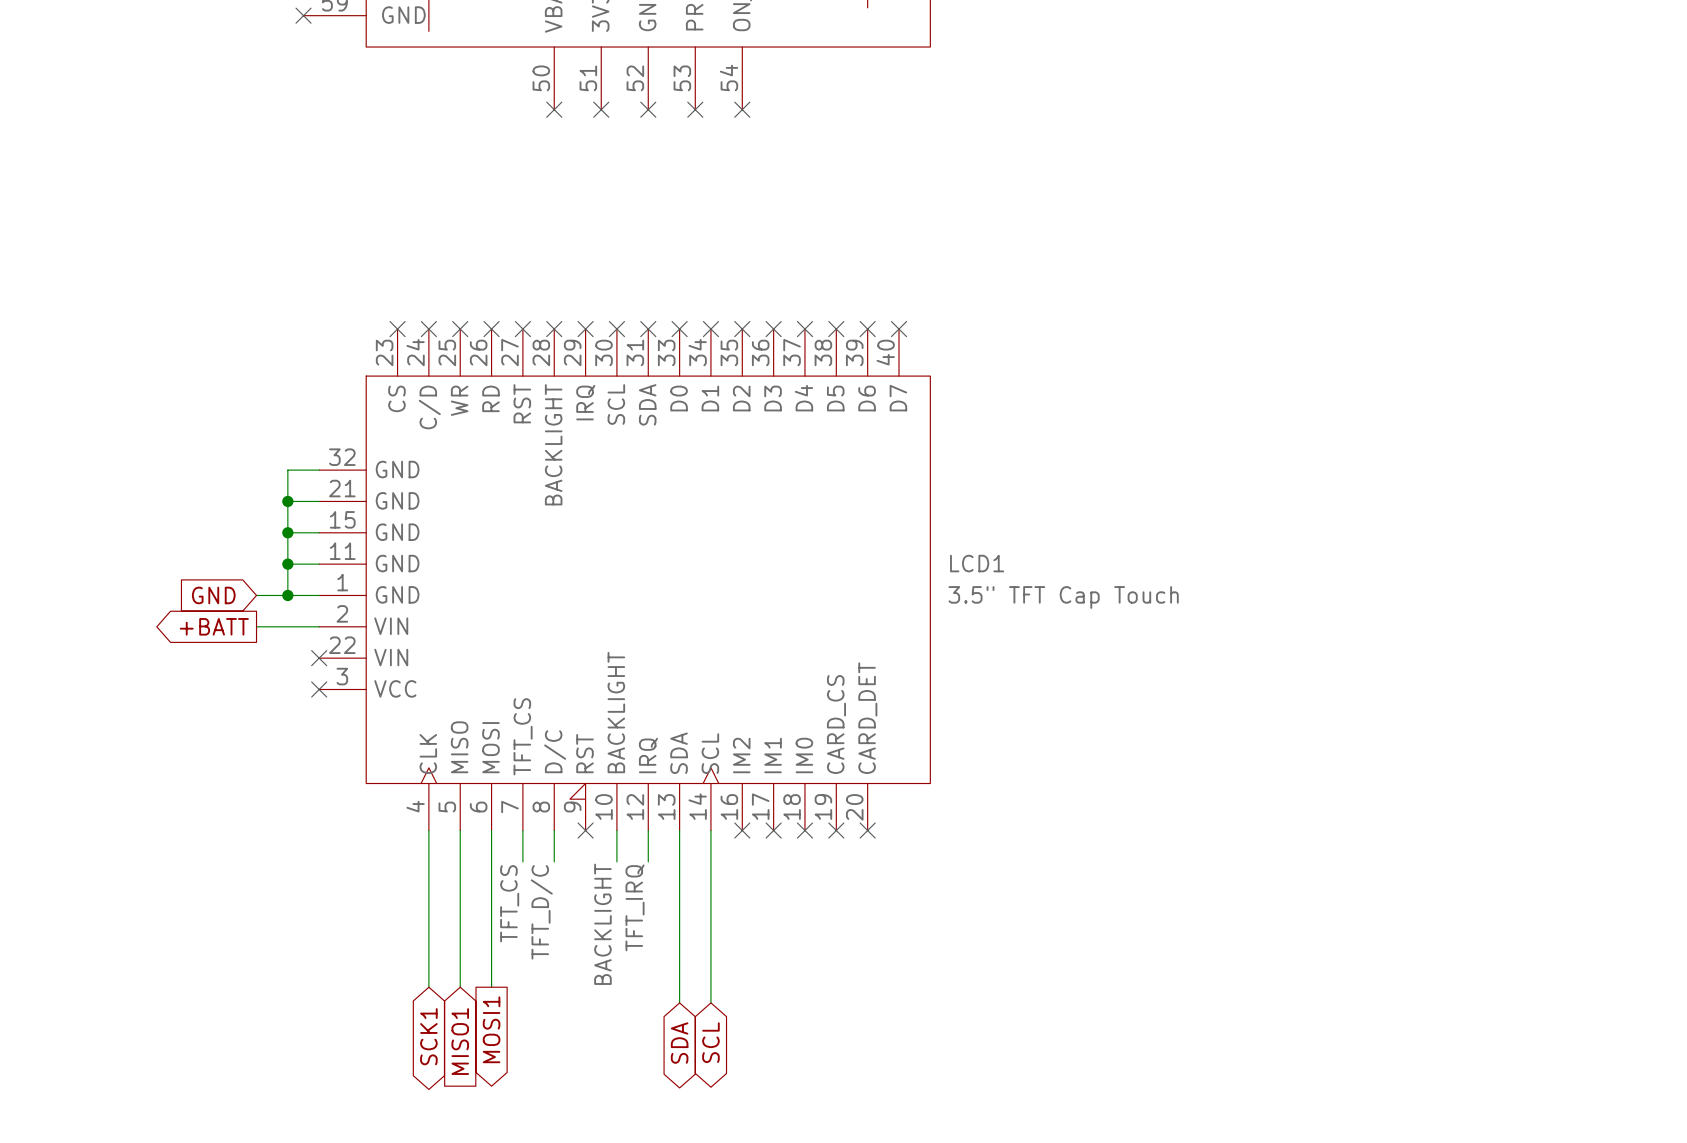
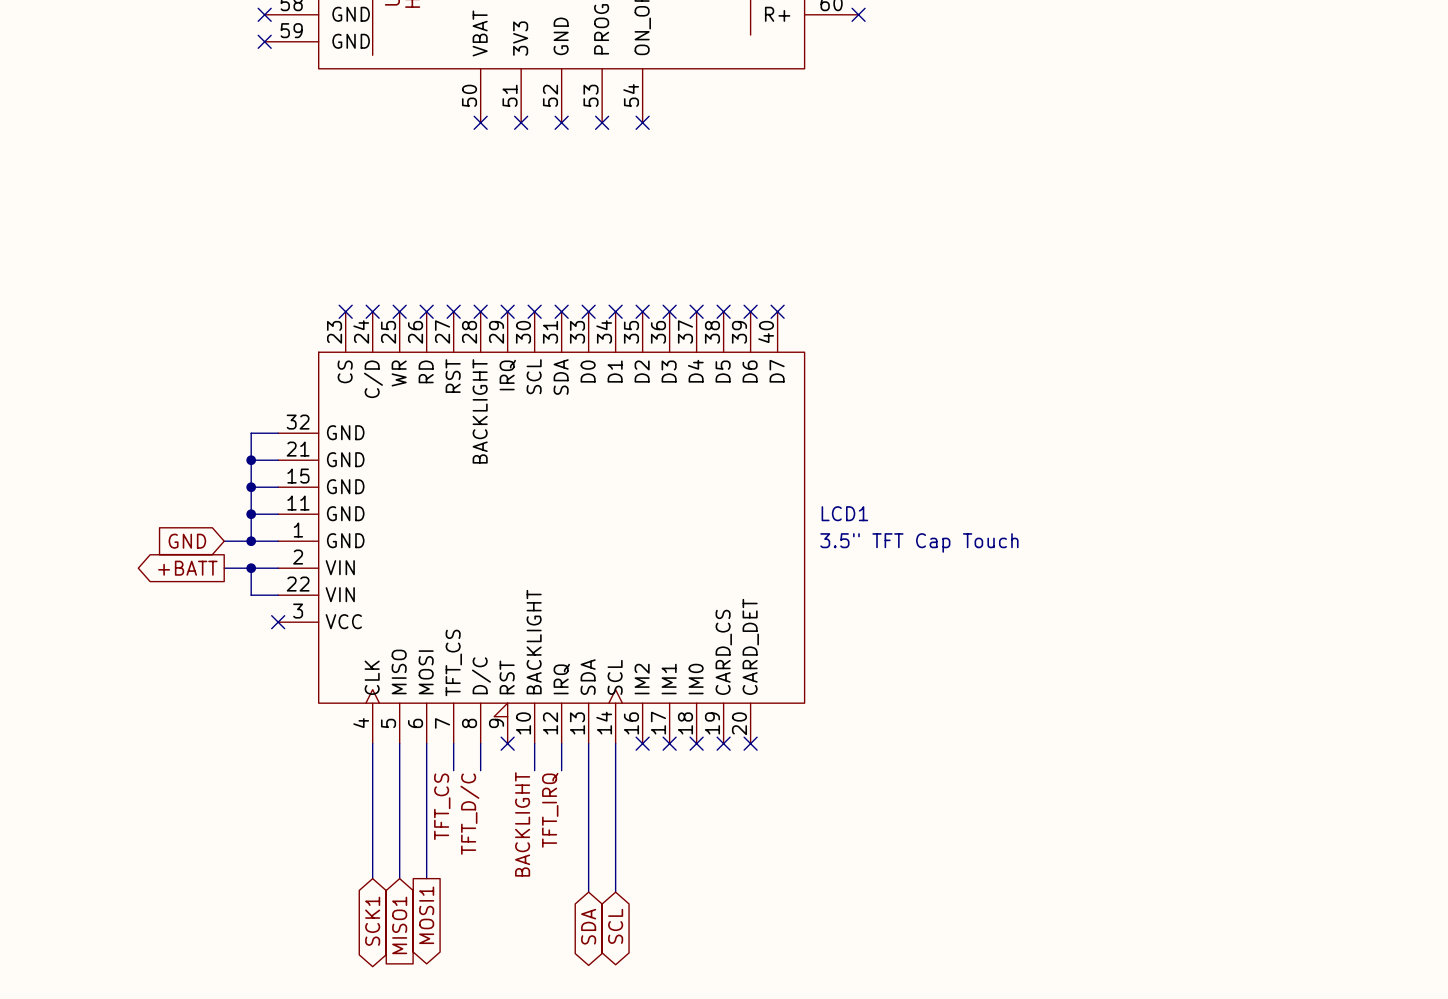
wire: none -> (251, 568) (251, 595) (278, 595)
junction: none -> (251, 568)
no-connect mark: (319, 658) -> none

